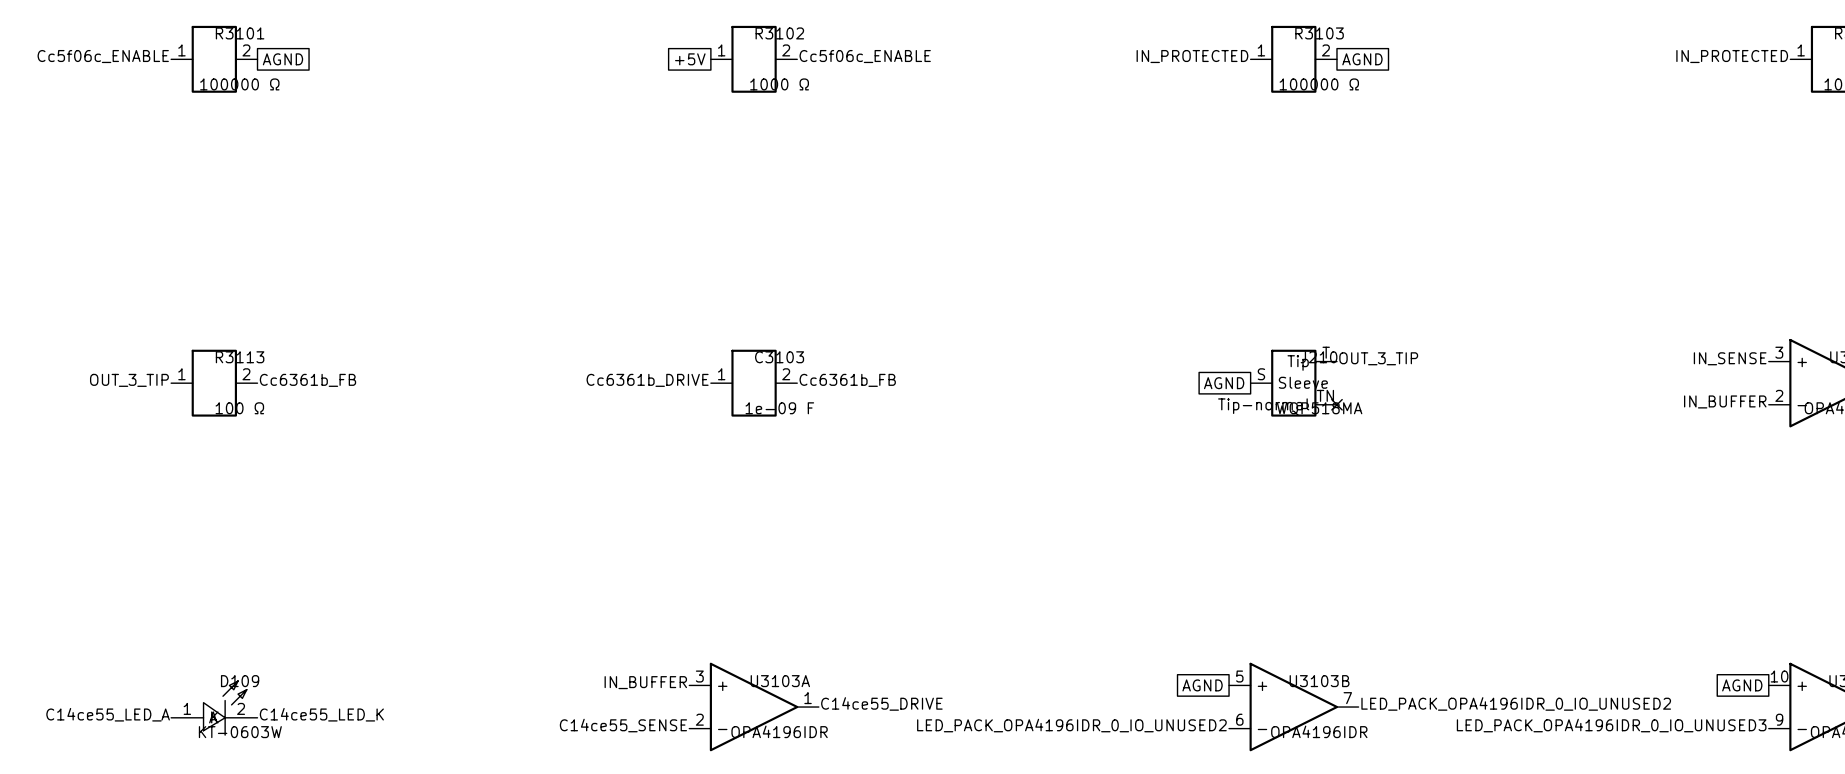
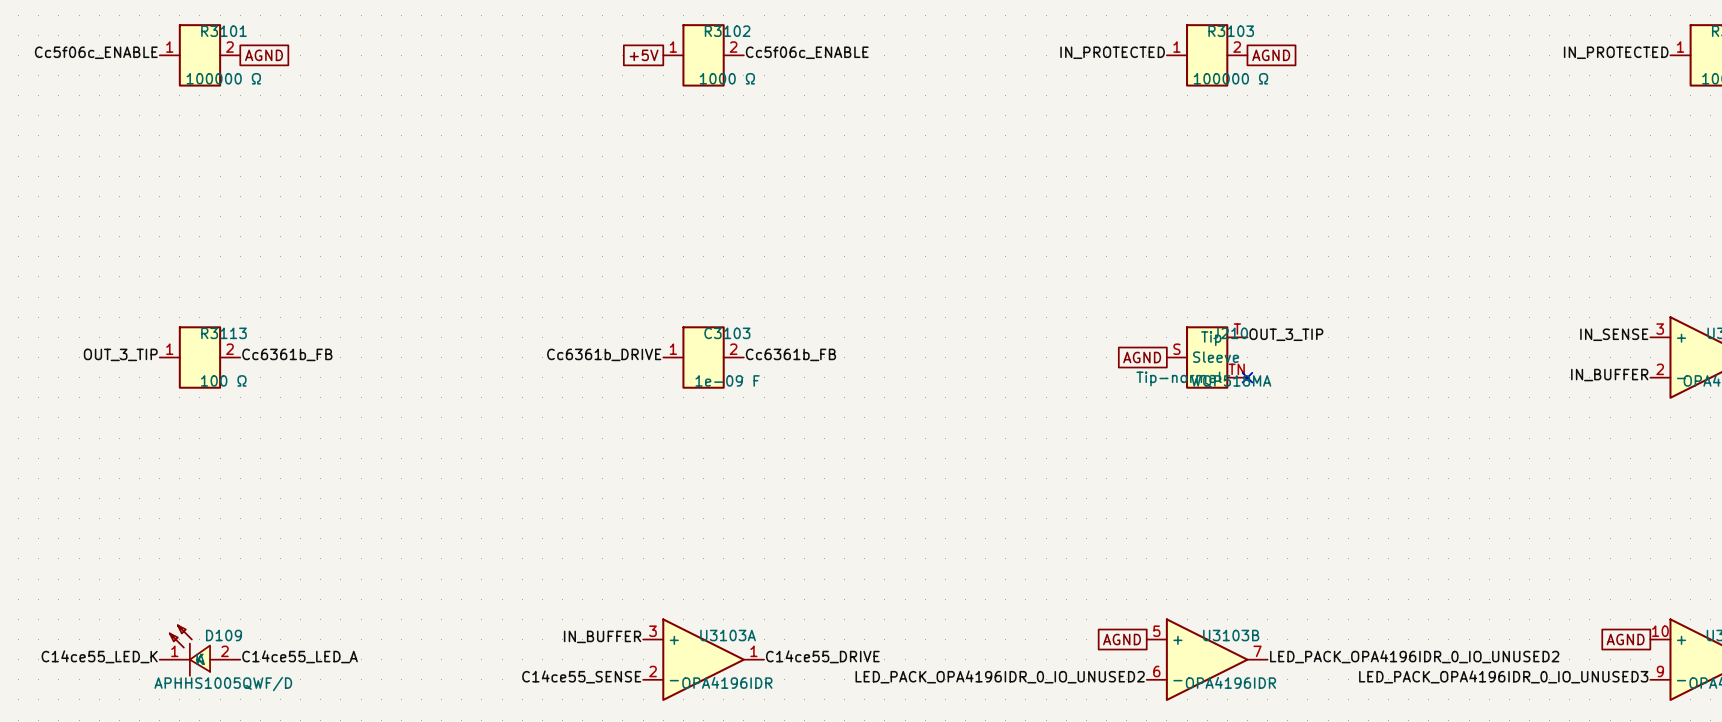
D109 symbol: [171, 681, 258, 736] -> [159, 625, 241, 676]
label position: C14ce55_LED_A (108, 714) -> C14ce55_LED_A (300, 656)
label position: C14ce55_LED_K (321, 714) -> C14ce55_LED_K (99, 656)
D109 value: KT-0603W (240, 732) -> APHHS1005QWF/D (223, 684)

